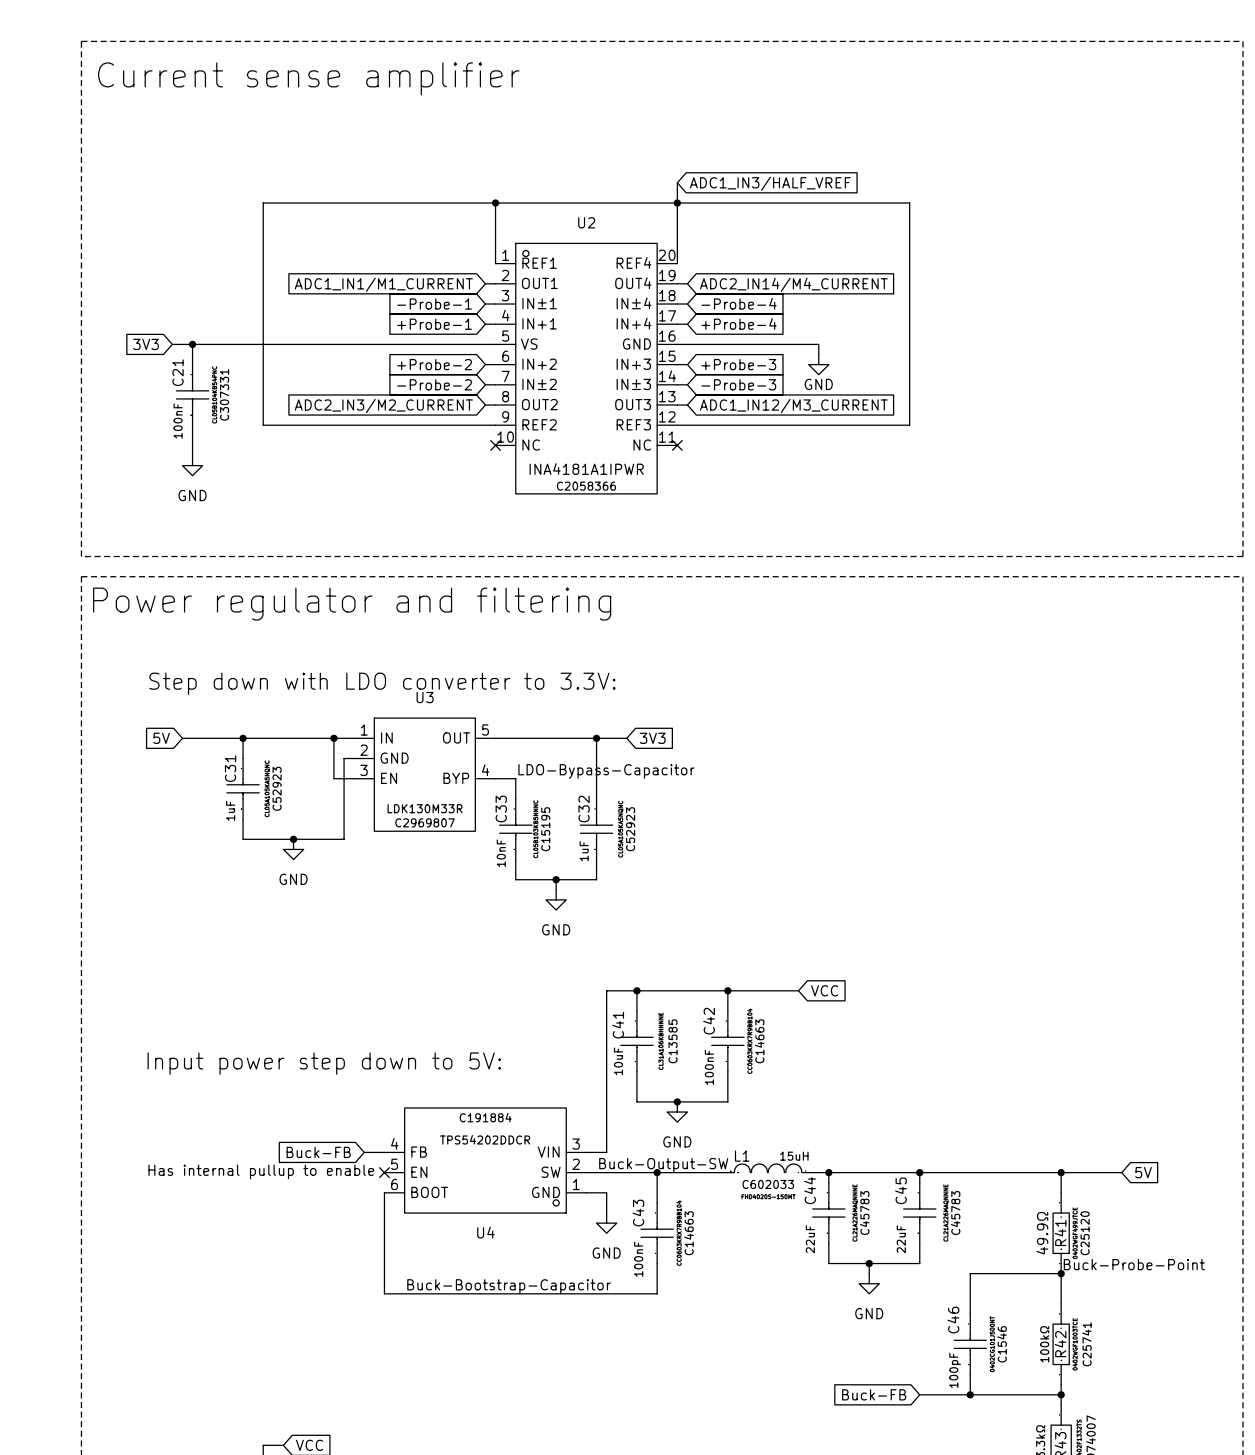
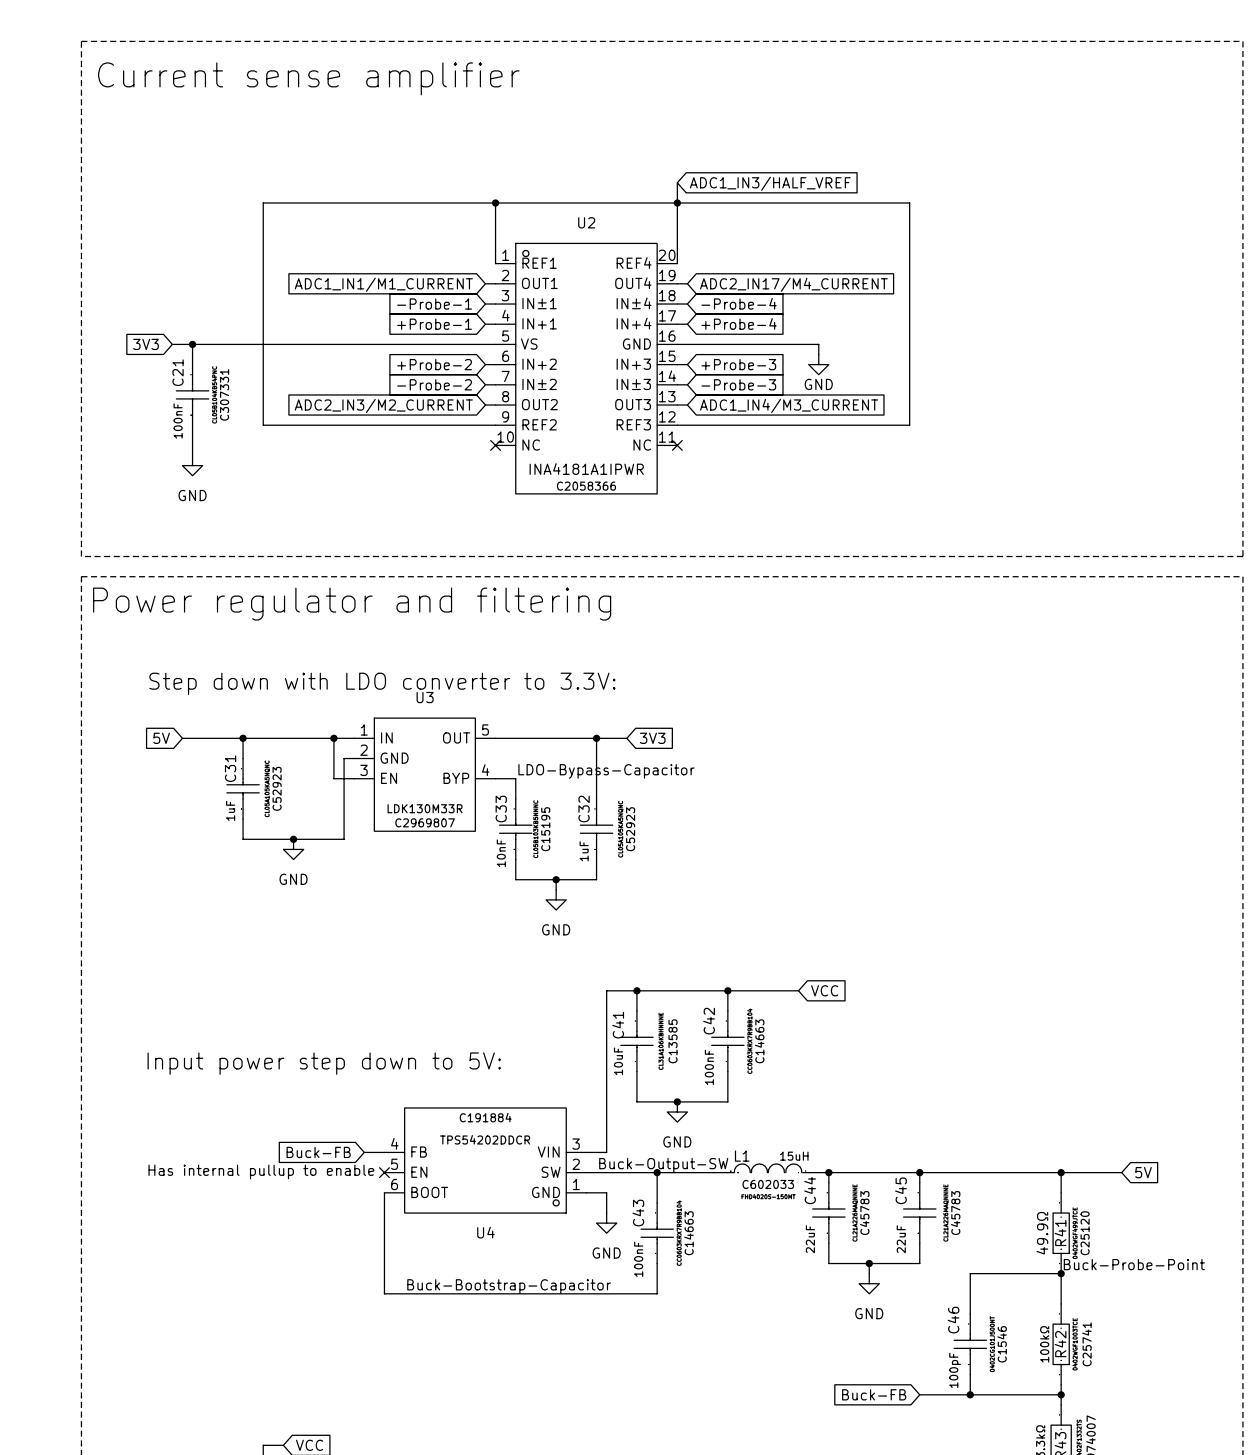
global label: ADC2_IN14/M4_CURRENT (793, 284) -> ADC2_IN17/M4_CURRENT (793, 284)
global label: ADC1_IN12/M3_CURRENT (793, 405) -> ADC1_IN4/M3_CURRENT (789, 405)

